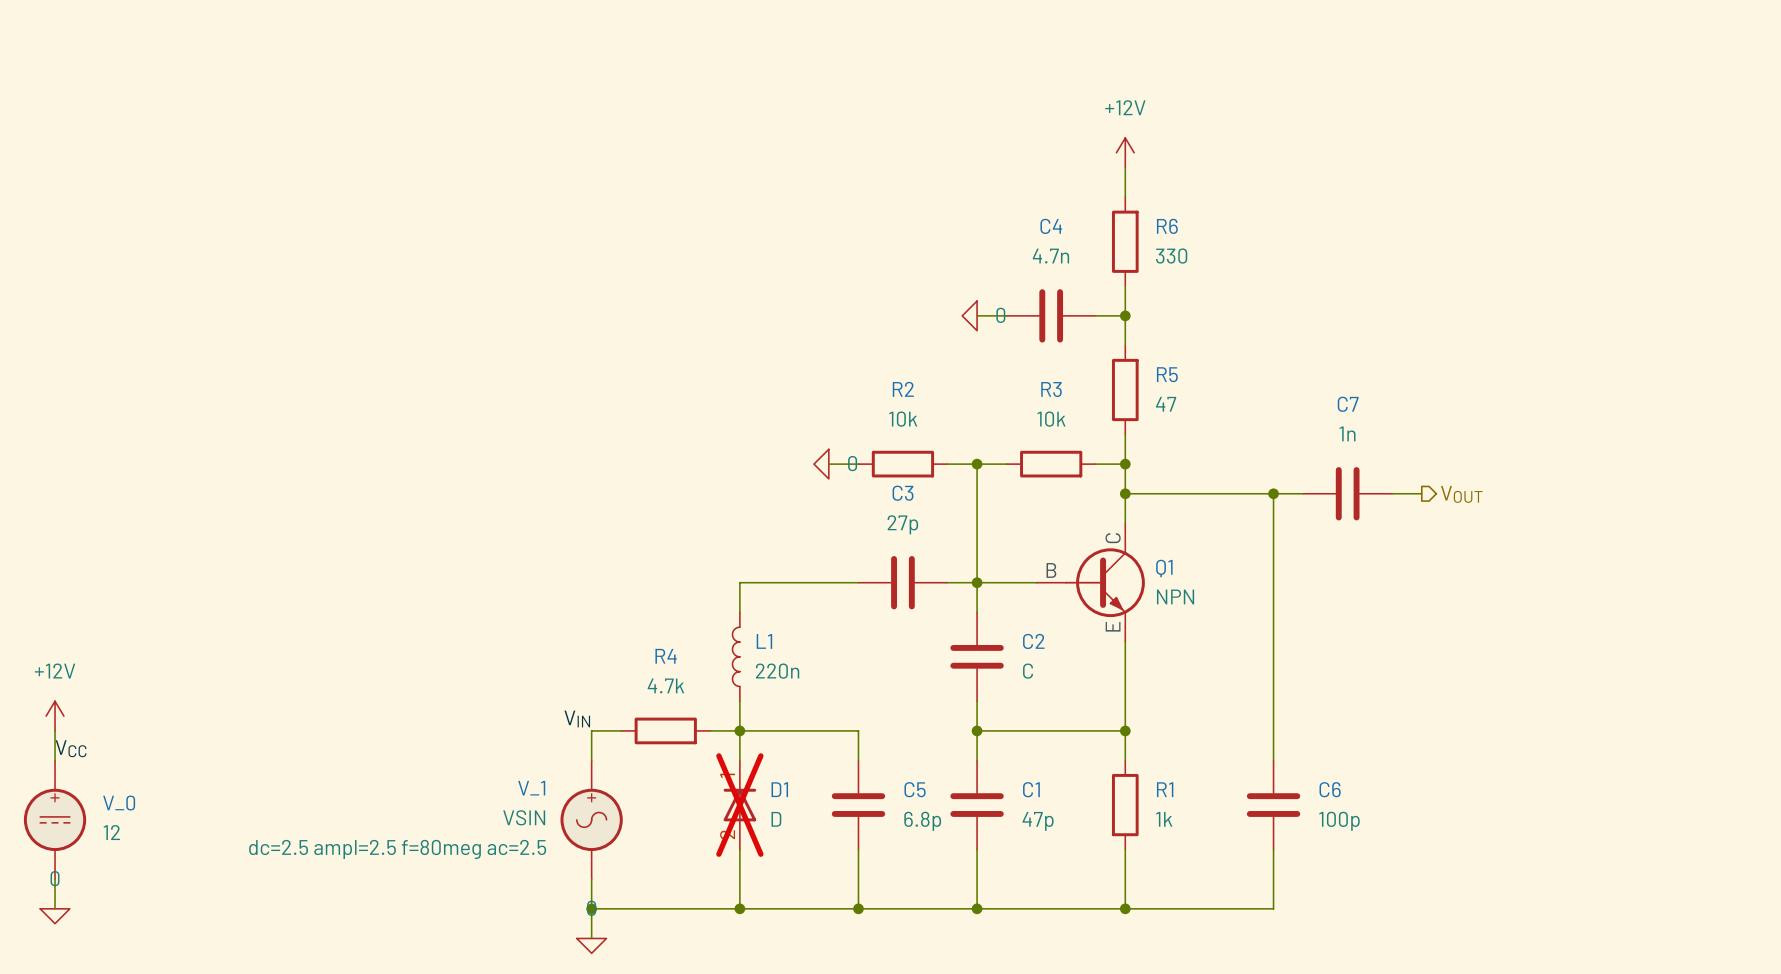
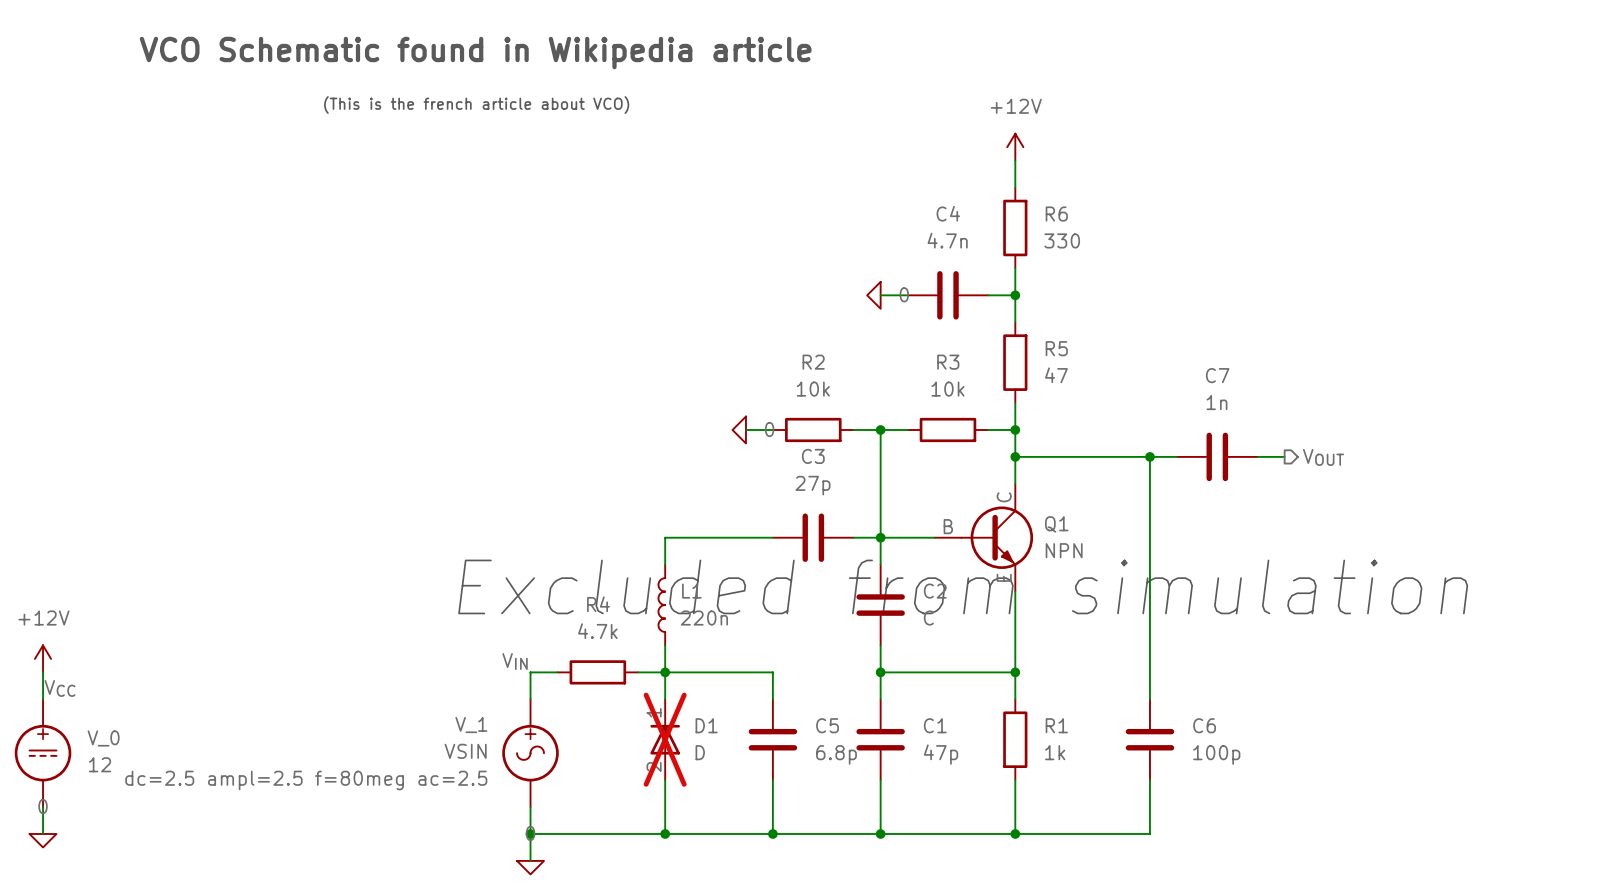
text: none -> VCO Schematic found in Wikipedia article (475, 53)
text: none -> (This is the french article about VCO) (476, 105)
text: none -> Excluded from simulation (963, 586)

